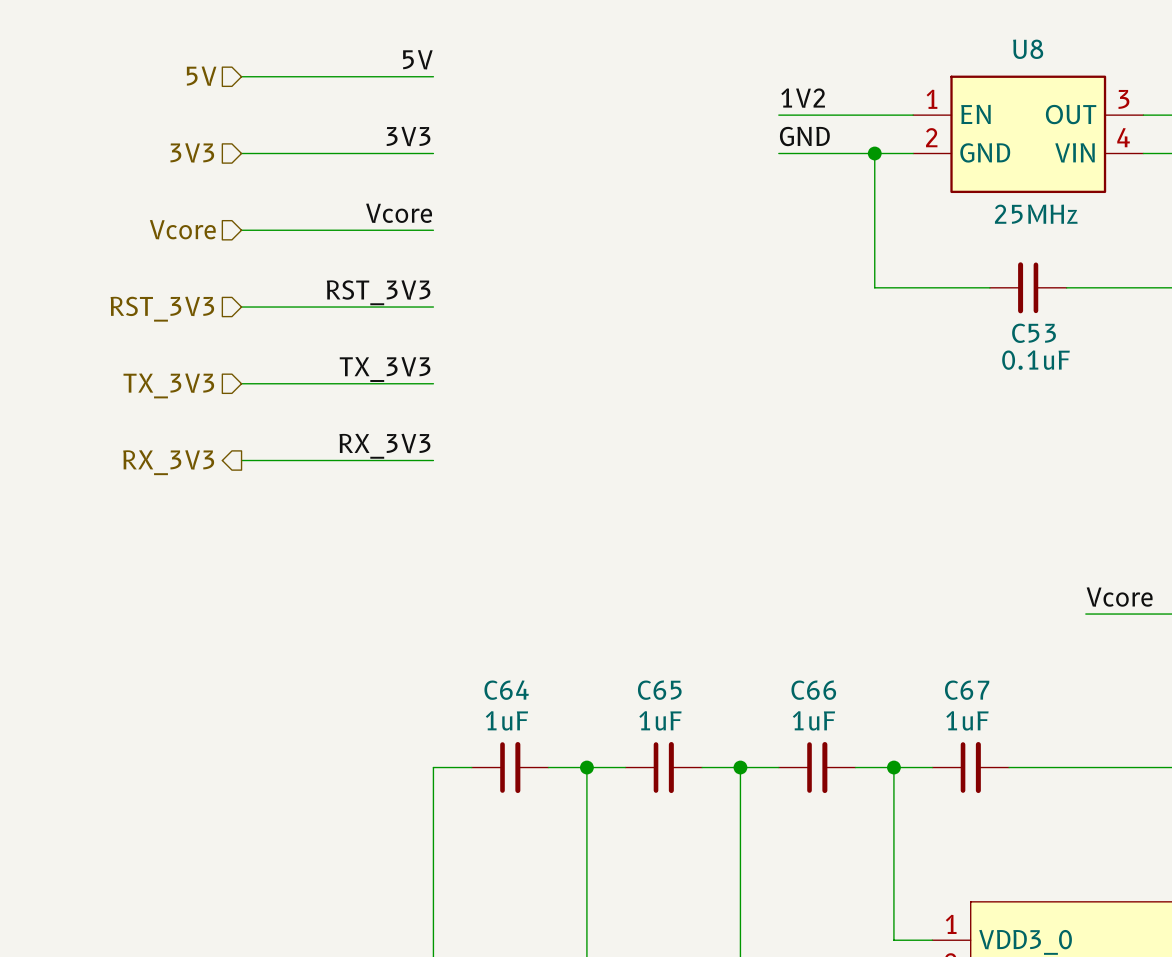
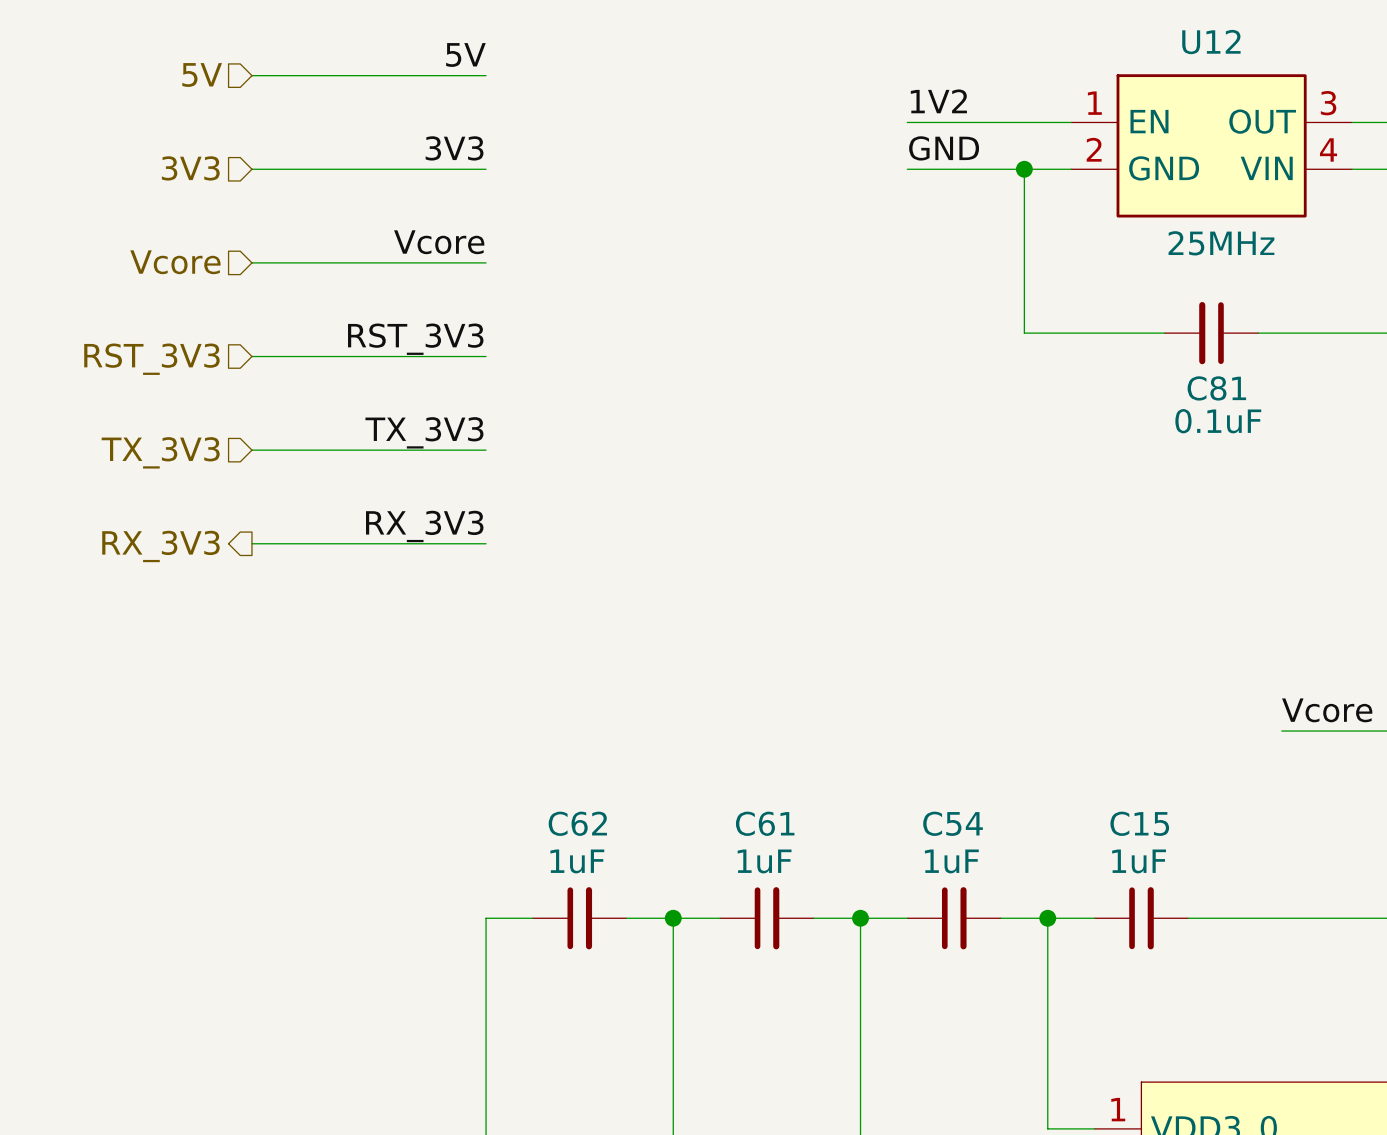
U8 name: U8 (1028, 49) -> U12 (1211, 42)
C53 name: C53 (1034, 333) -> C81 (1216, 388)
C64 name: C64 (506, 690) -> C62 (577, 823)
C65 name: C65 (659, 690) -> C61 (765, 823)
C66 name: C66 (813, 690) -> C54 (953, 823)
C67 name: C67 (967, 690) -> C15 (1139, 823)

